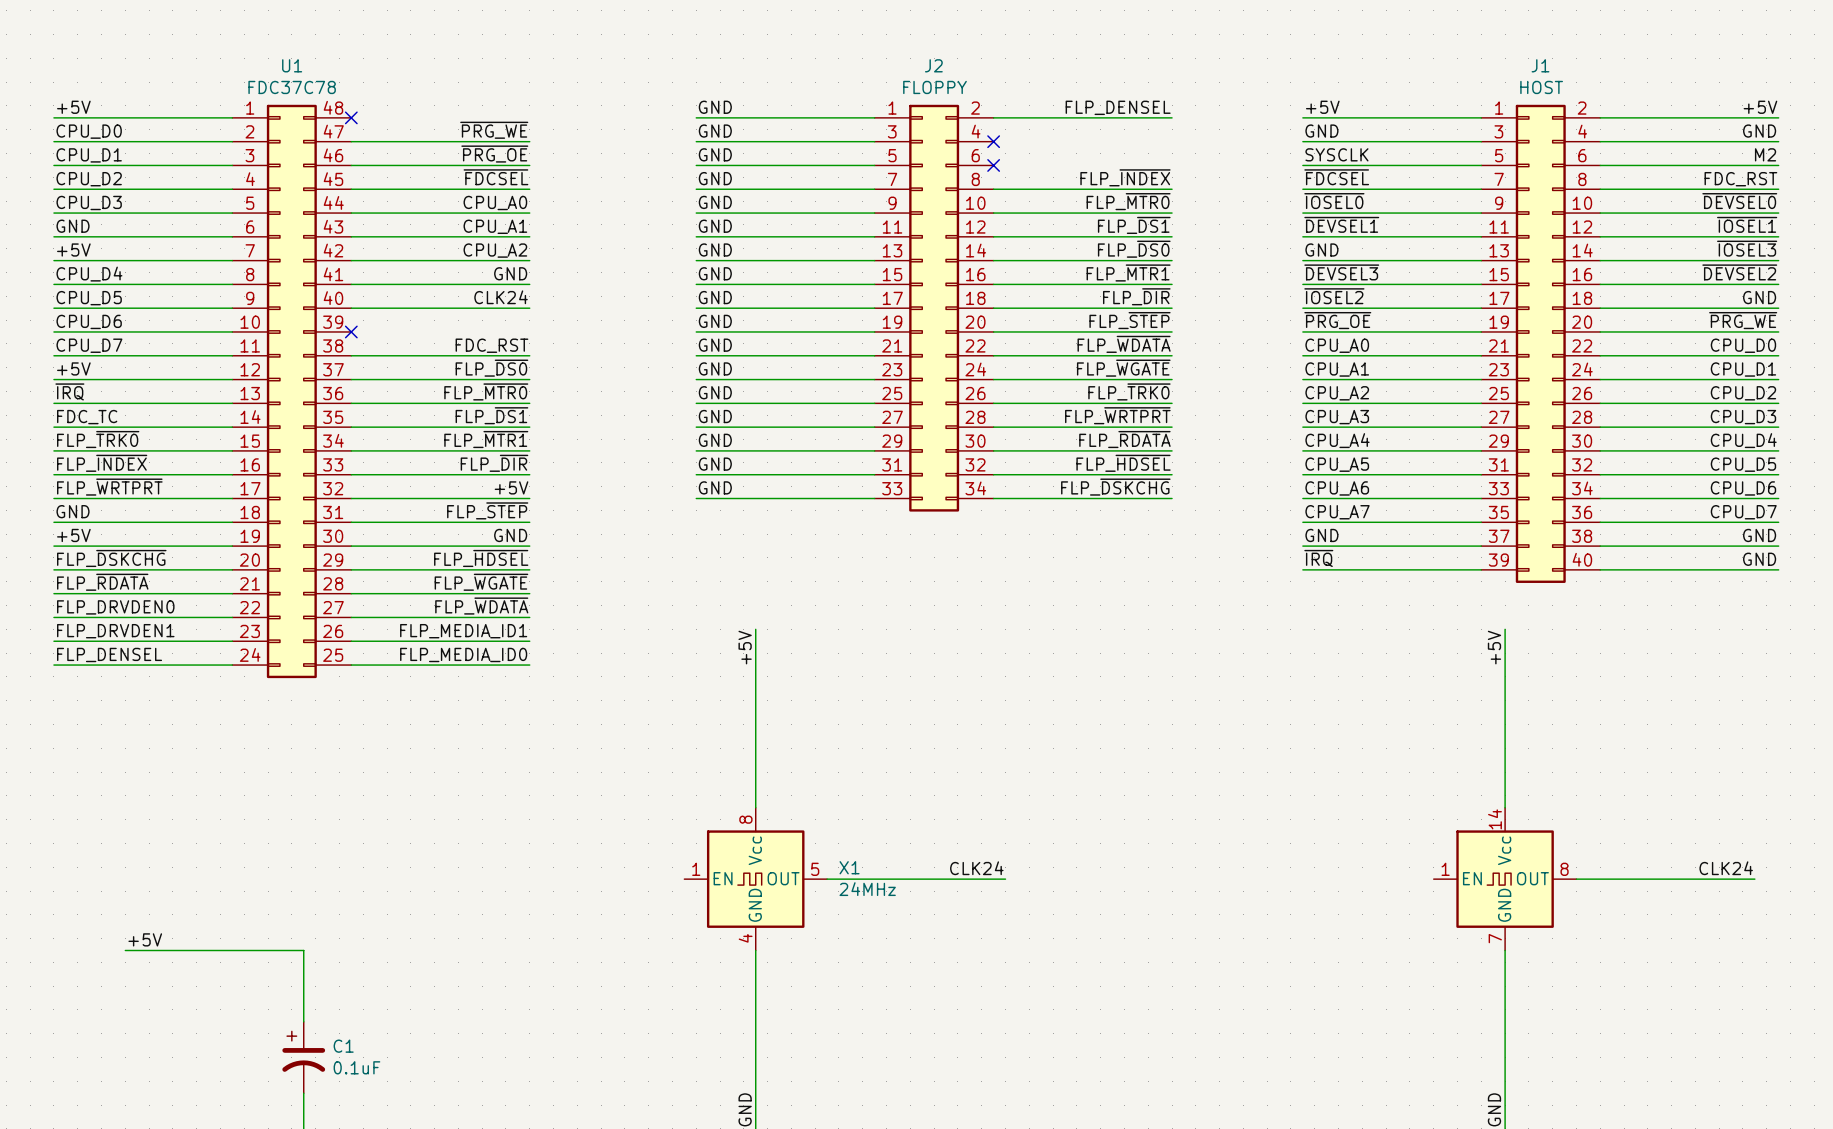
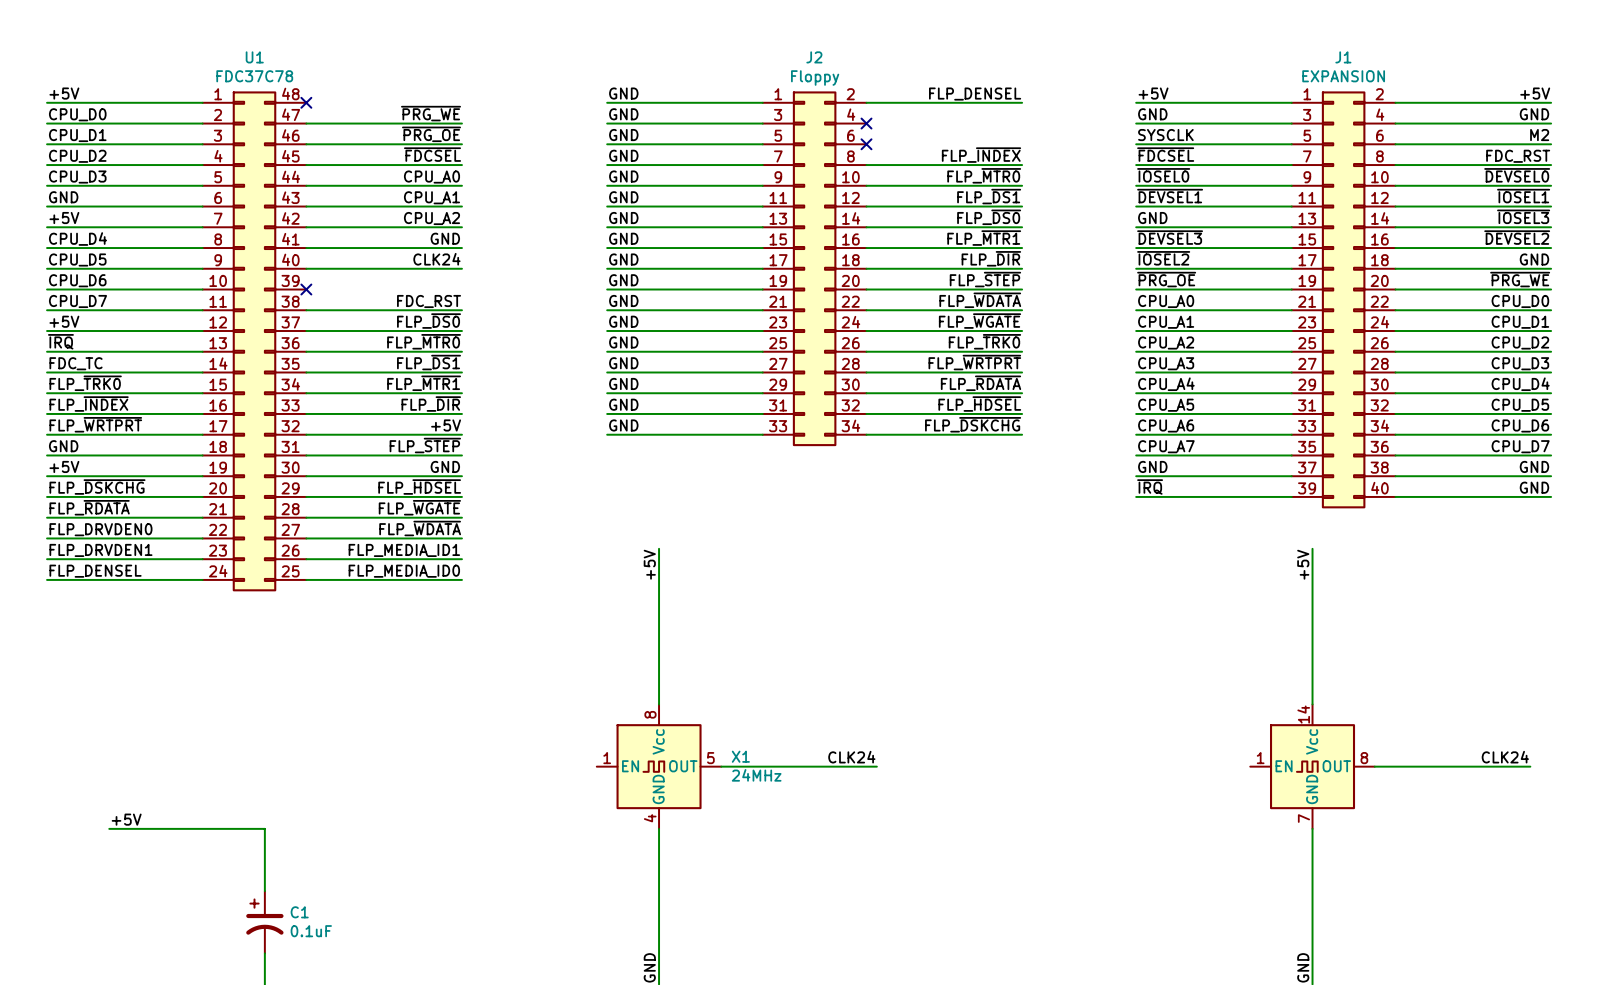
J2 value: FLOPPY (934, 87) -> Floppy (815, 78)
J1 value: HOST (1541, 87) -> EXPANSION (1343, 76)

